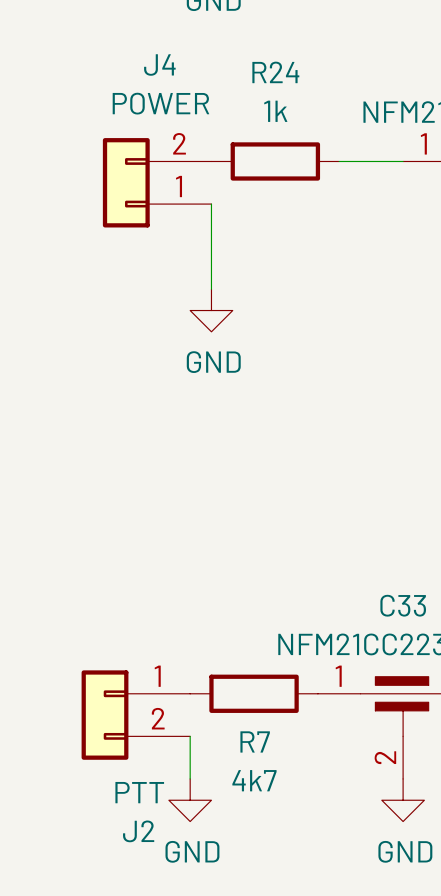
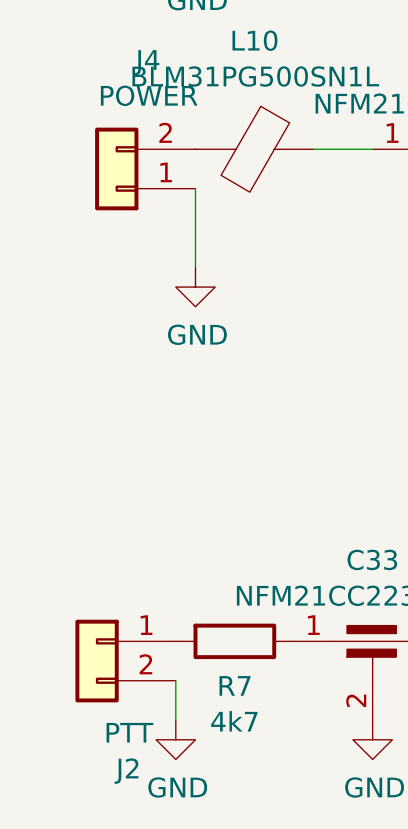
R24: 1k (275, 161) -> none
L10: none -> BLM31PG500SN1L (254, 149)

